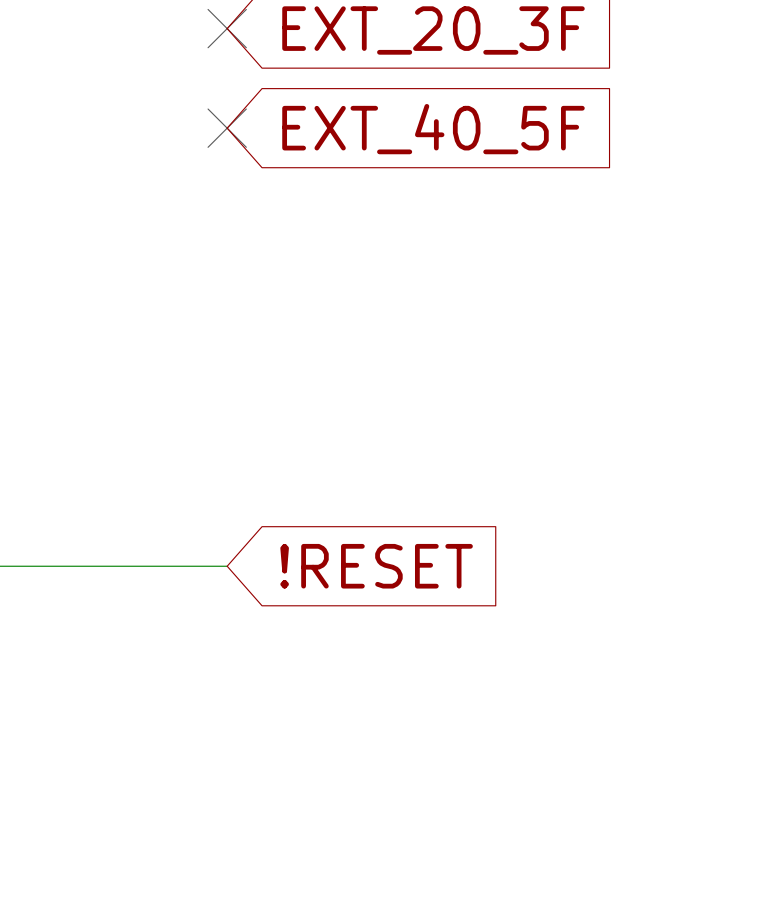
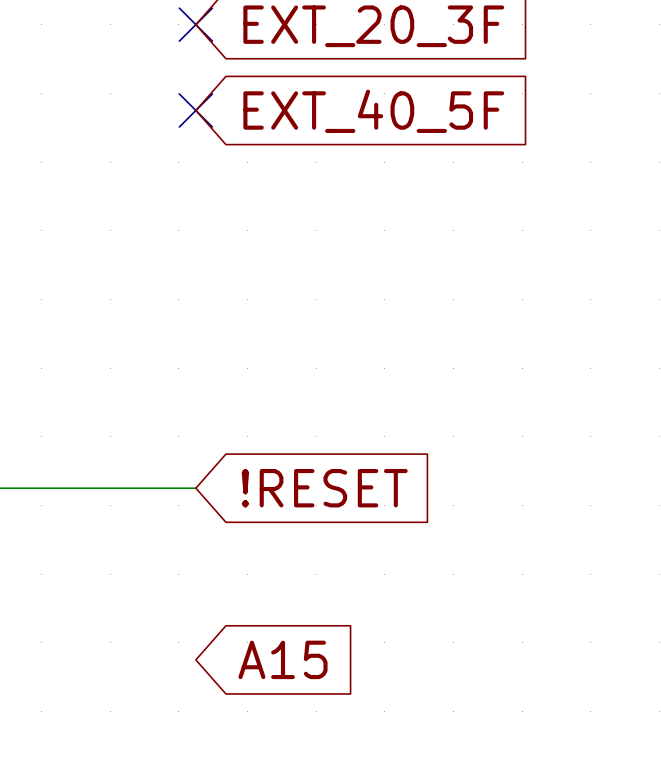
global label: none -> A15 (283, 659)

